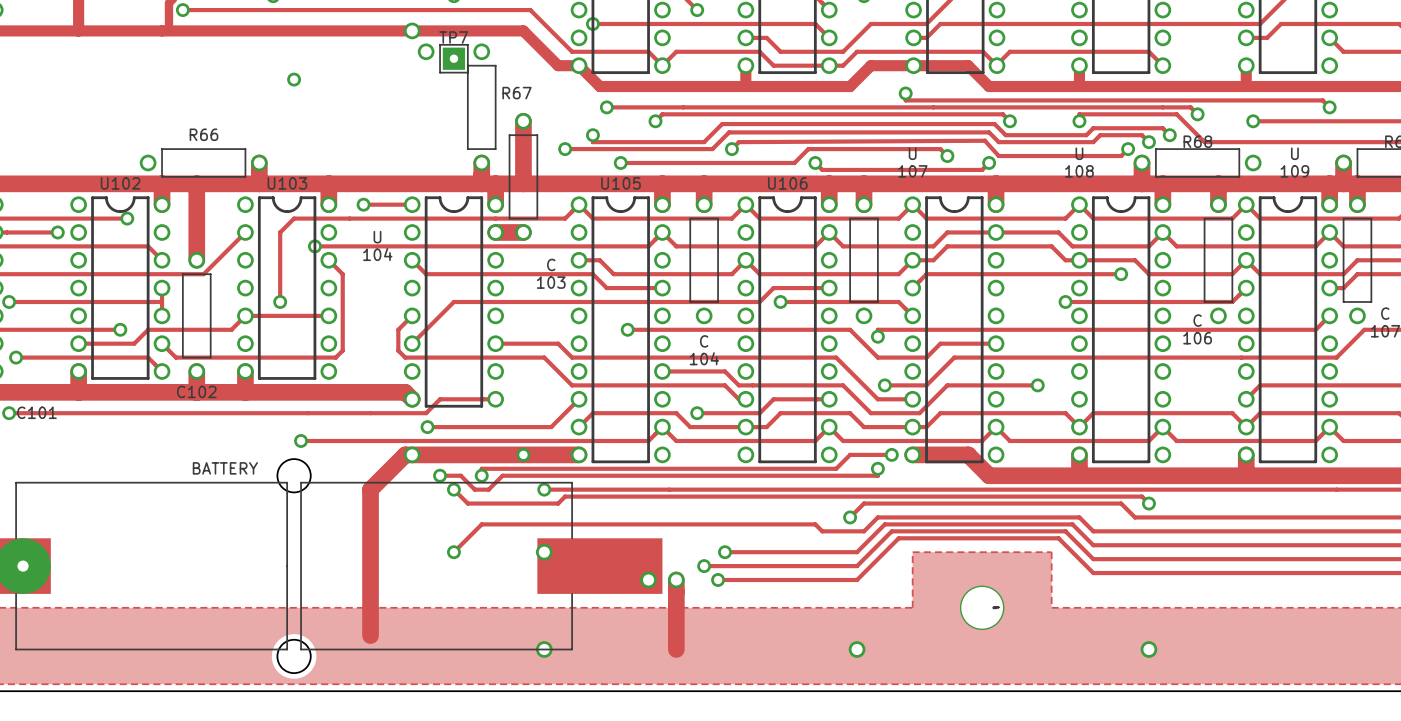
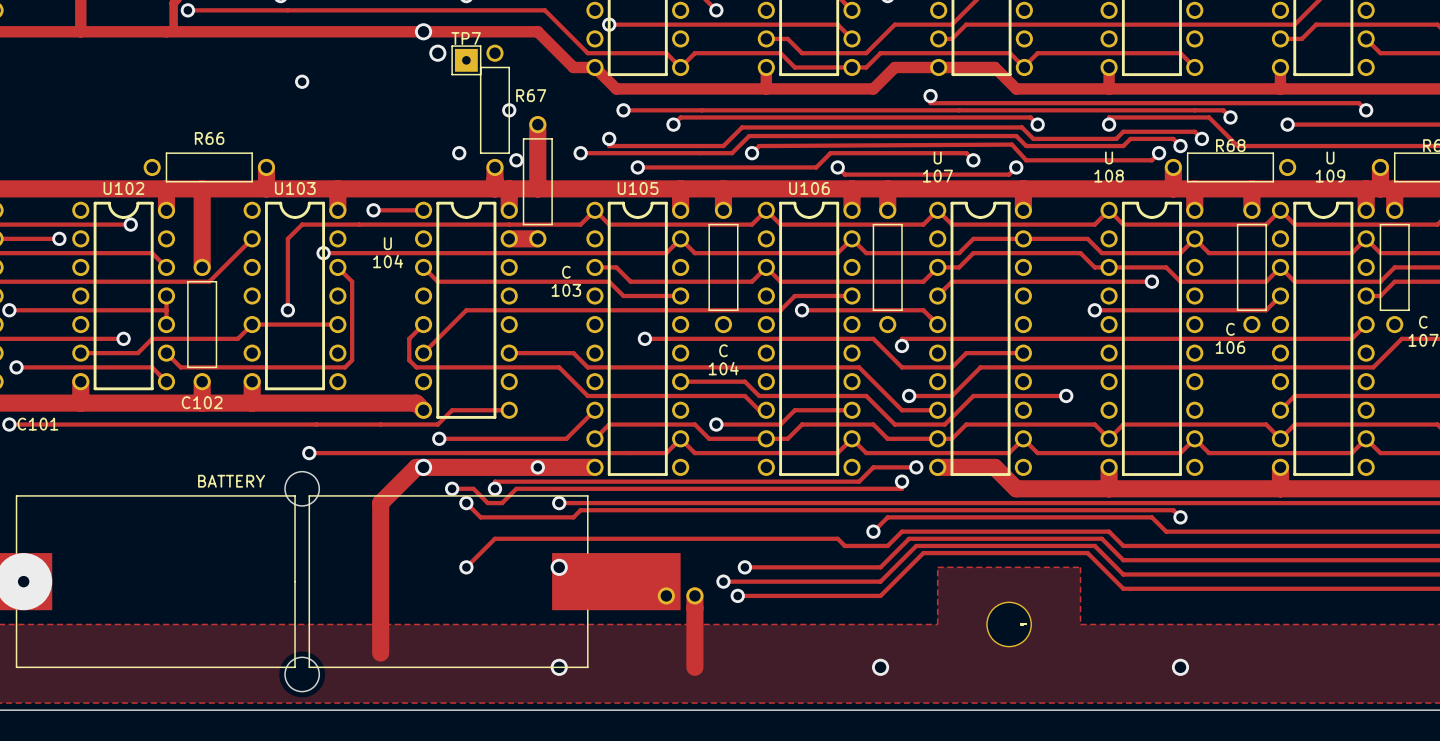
via: none -> (509, 110)
via: none -> (459, 153)
via: none -> (516, 160)

